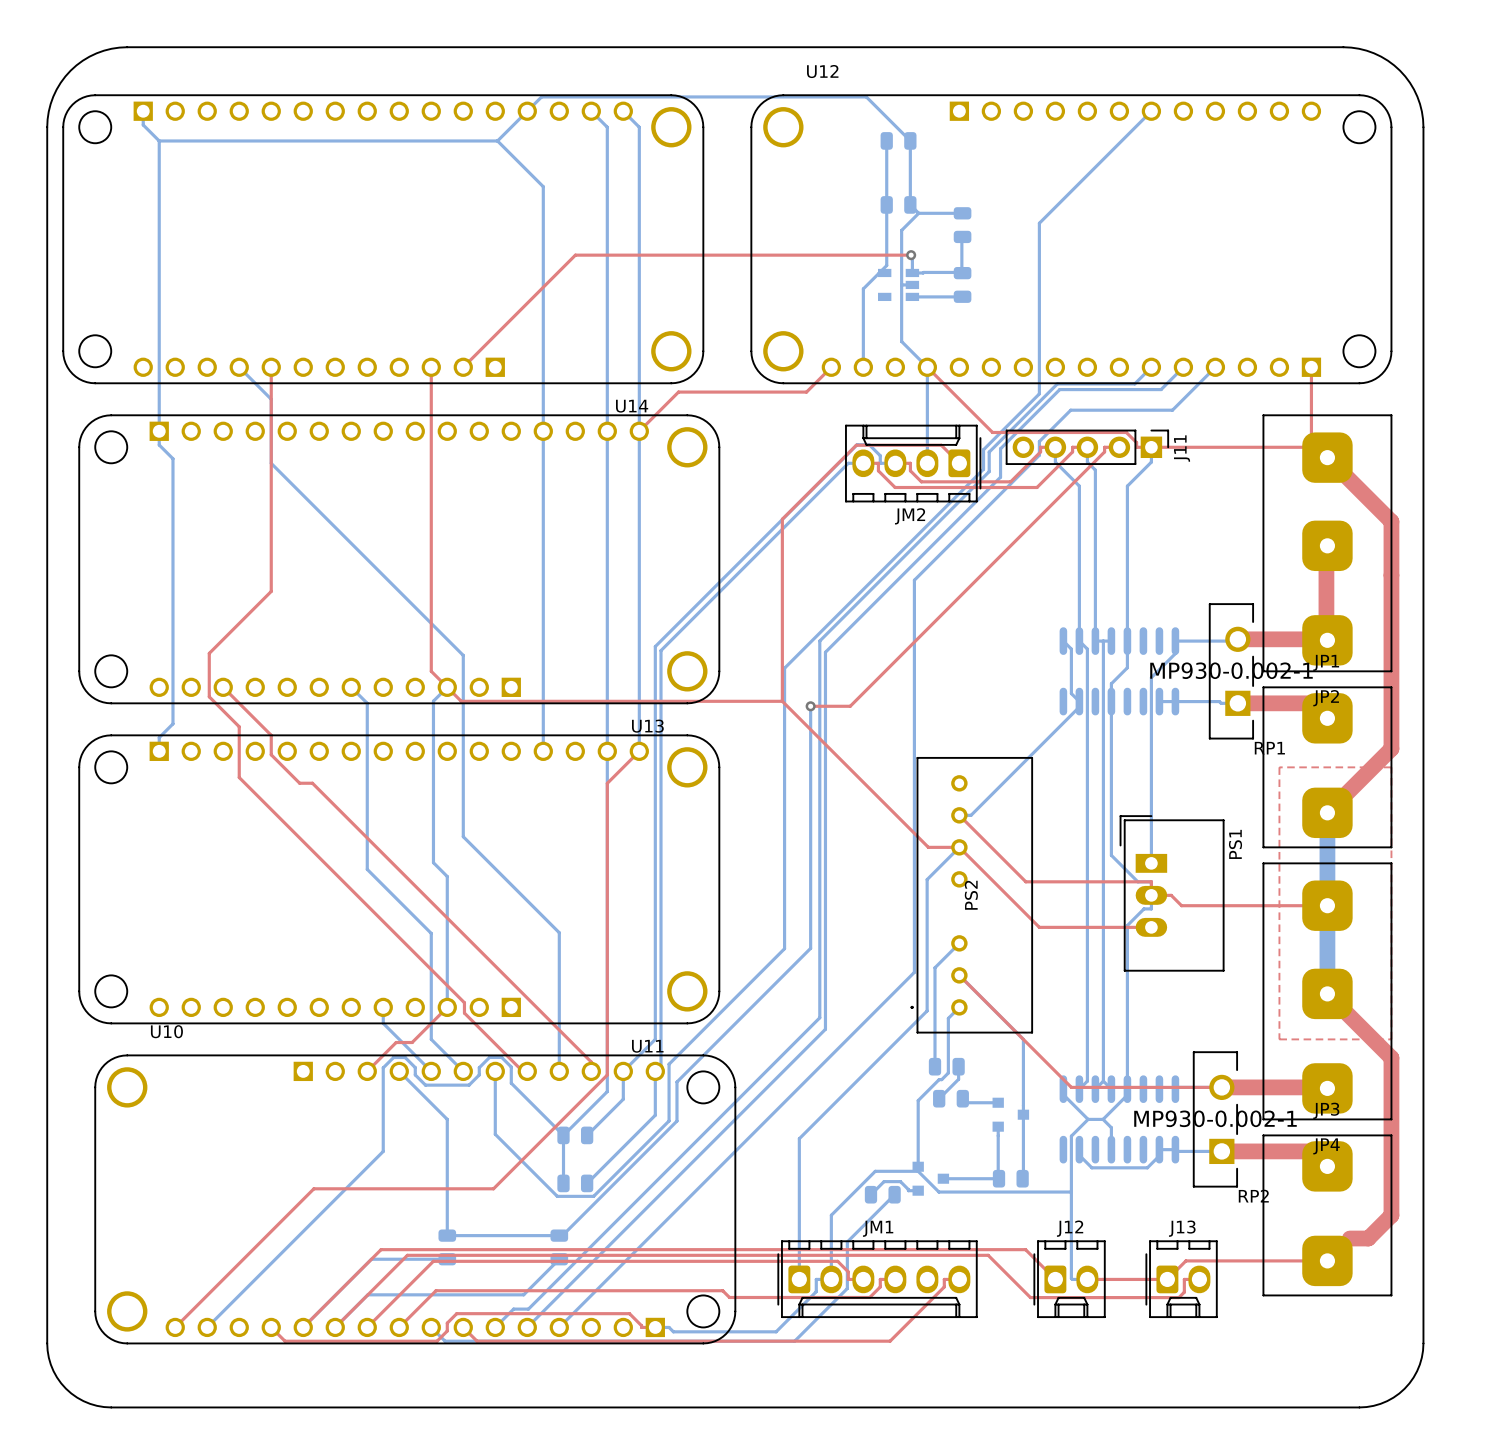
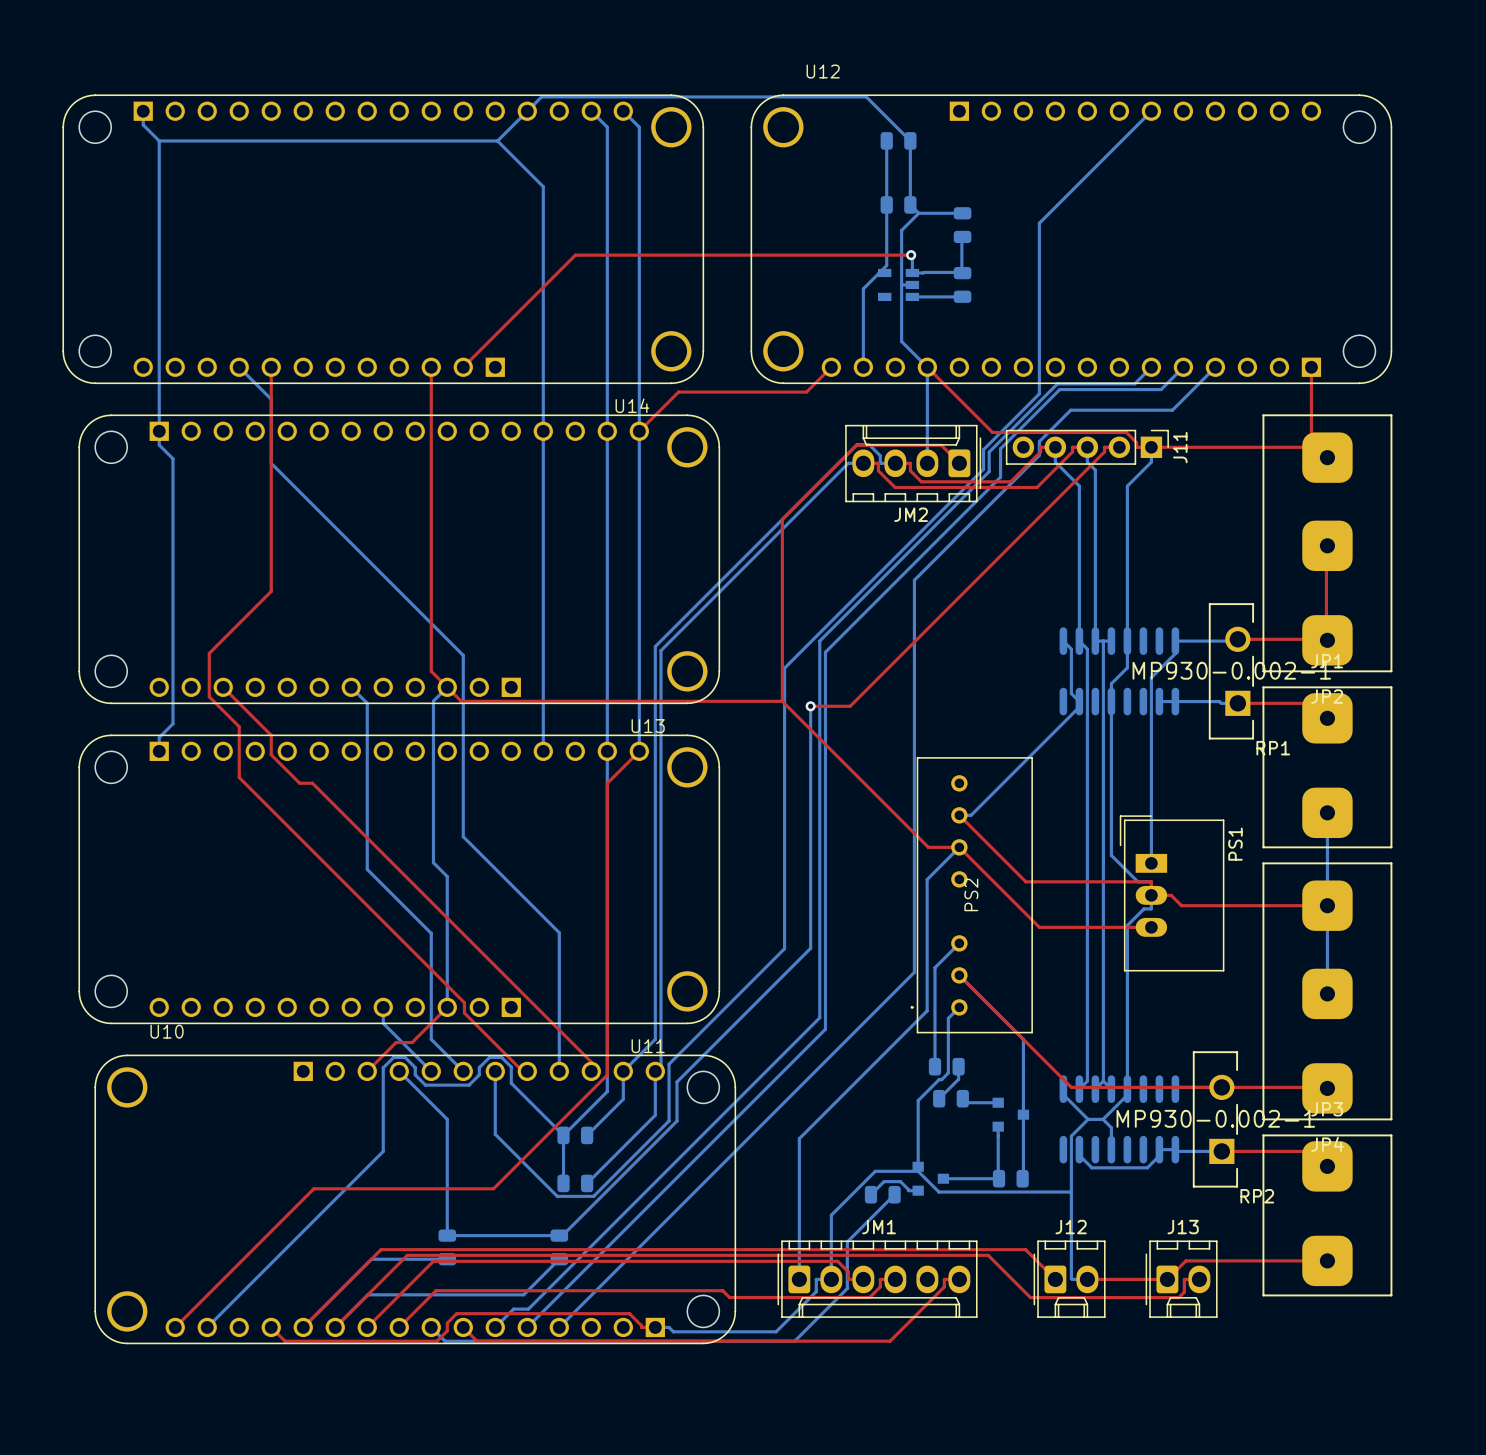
board edge: (127, 47) (1343, 47) (1359, 48) (1374, 53) (1387, 60) (1400, 70) (1409, 82) (1417, 96) (1421, 111) (1423, 127) (1423, 1343) (1421, 1357) (1417, 1371) (1404, 1388) (1393, 1397) (1380, 1403) (1359, 1407) (111, 1407) (96, 1405) (83, 1401) (65, 1388) (53, 1371) (48, 1357) (47, 1343) (47, 127) (48, 111) (53, 96) (60, 82) (70, 70) (82, 60) (96, 53) (111, 48) (127, 47) -> none
top track: (1327, 457) (1391, 521) (1391, 748) (1327, 812) -> none
top track width: thick (1326, 546) (1326, 639) (1237, 639) -> thin (1326, 546) (1326, 639) (1237, 639)
top track width: thick (1237, 703) (1312, 703) -> thin (1237, 703) (1312, 703)
top zone outline: (1279, 767) (1279, 1039) (1391, 1039) (1391, 767) (1279, 767) -> none
bottom track width: thick (1327, 812) (1327, 993) -> thin (1327, 812) (1327, 993)
top track: (1327, 993) (1391, 1057) (1391, 1215) (1368, 1238) (1349, 1238) (1327, 1260) -> none
top track width: thick (1221, 1087) (1326, 1087) -> thin (1221, 1087) (1326, 1087)
top track width: thick (1221, 1151) (1312, 1151) -> thin (1221, 1151) (1312, 1151)

